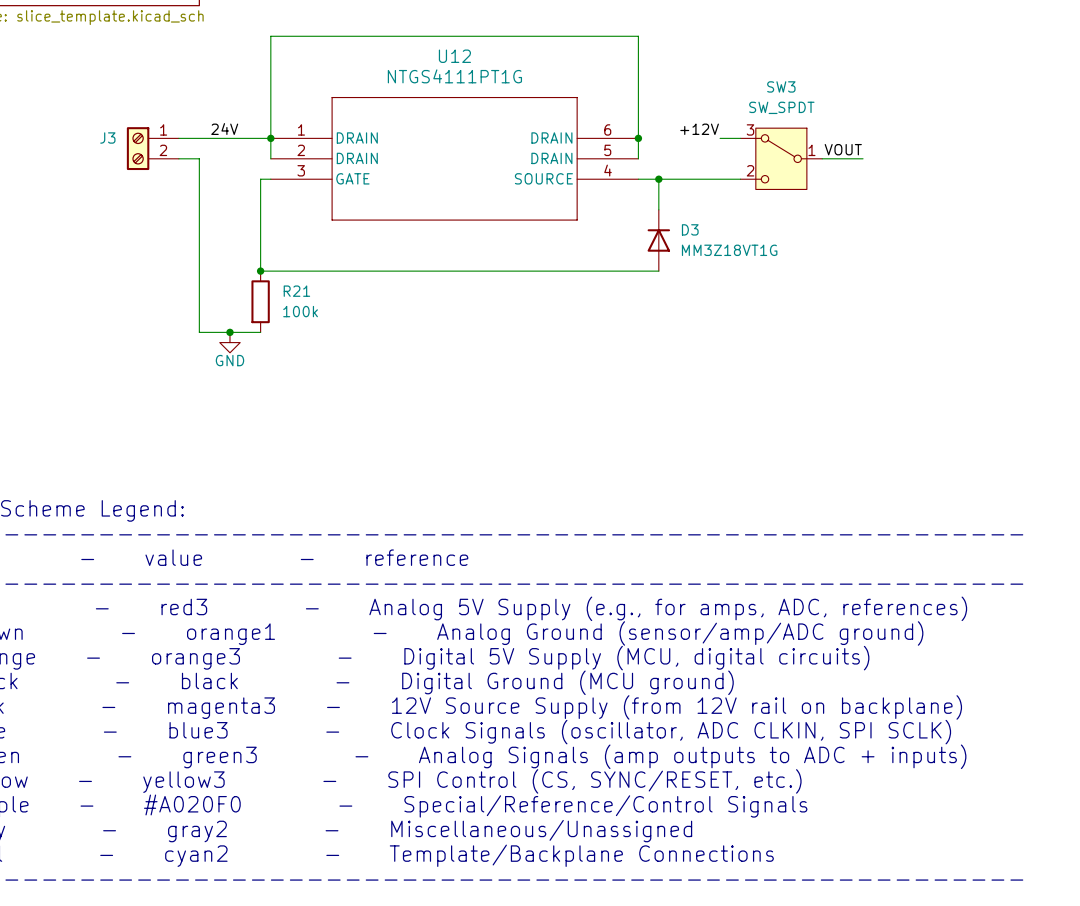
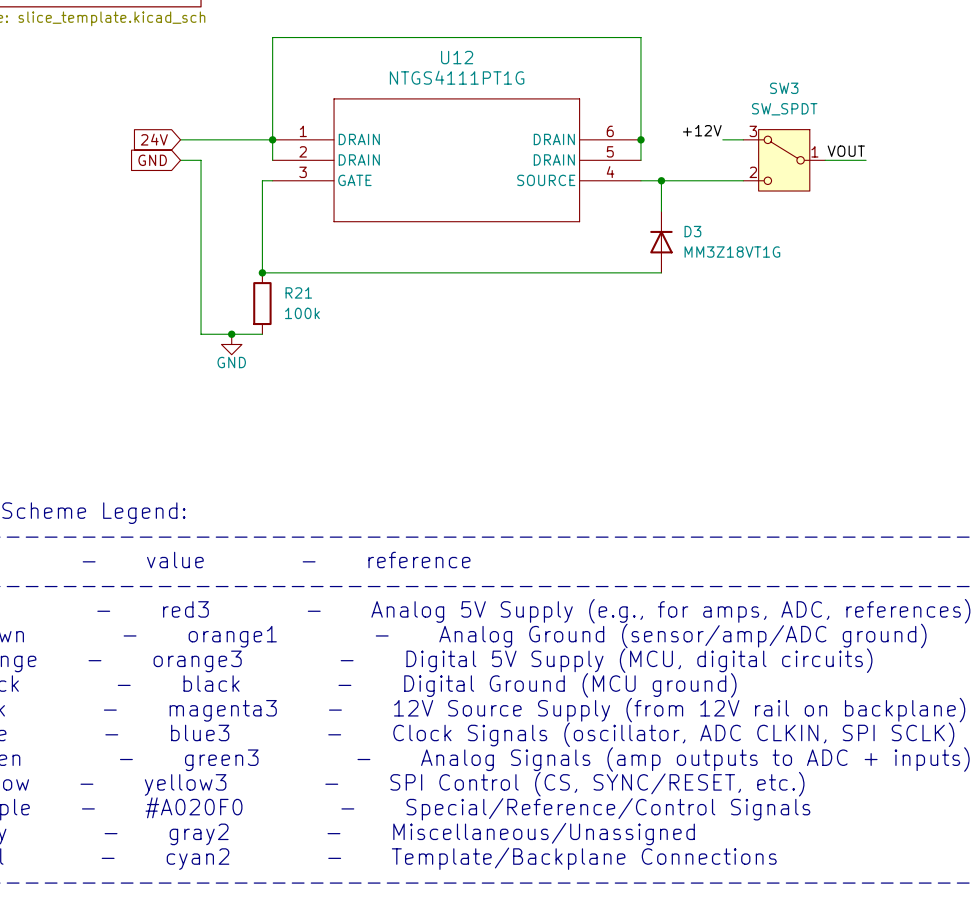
label: 24V (224, 129) -> none
global label: none -> 24V (154, 139)
J3: (152, 148) -> none
global label: none -> GND (152, 160)

